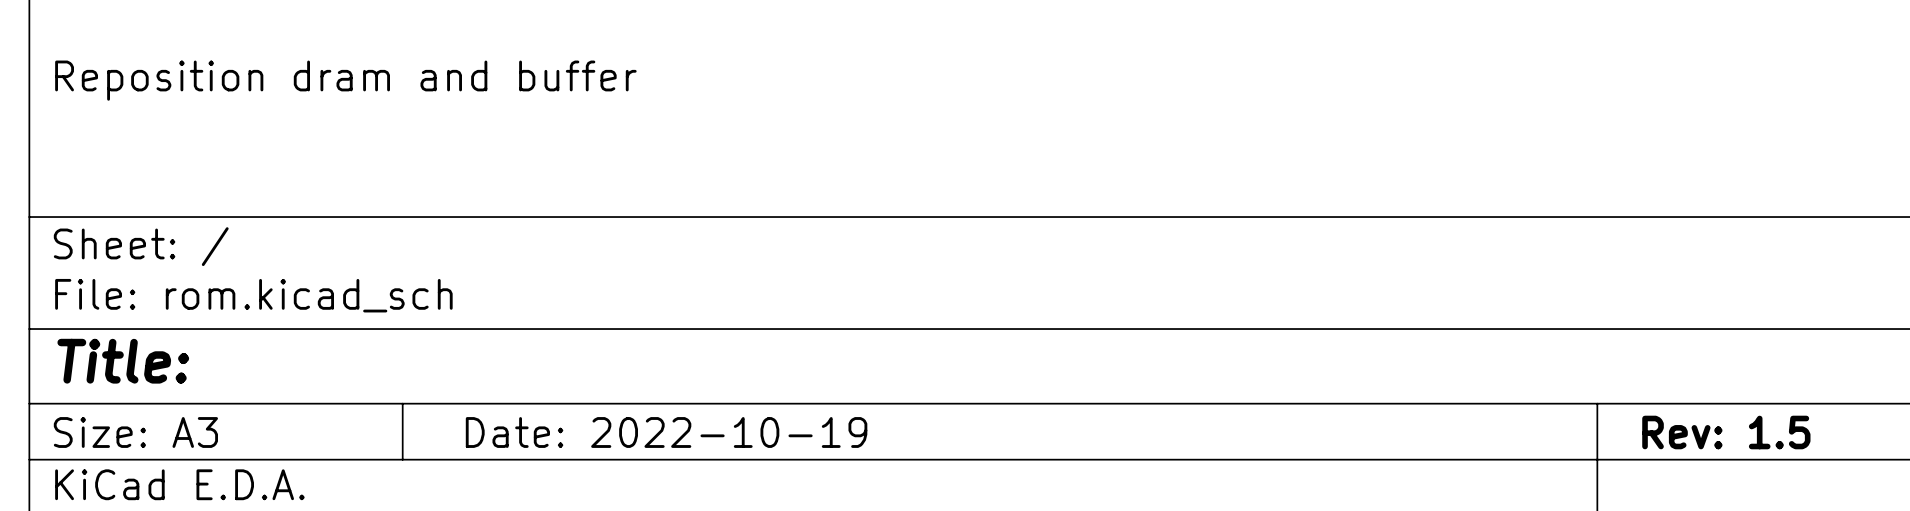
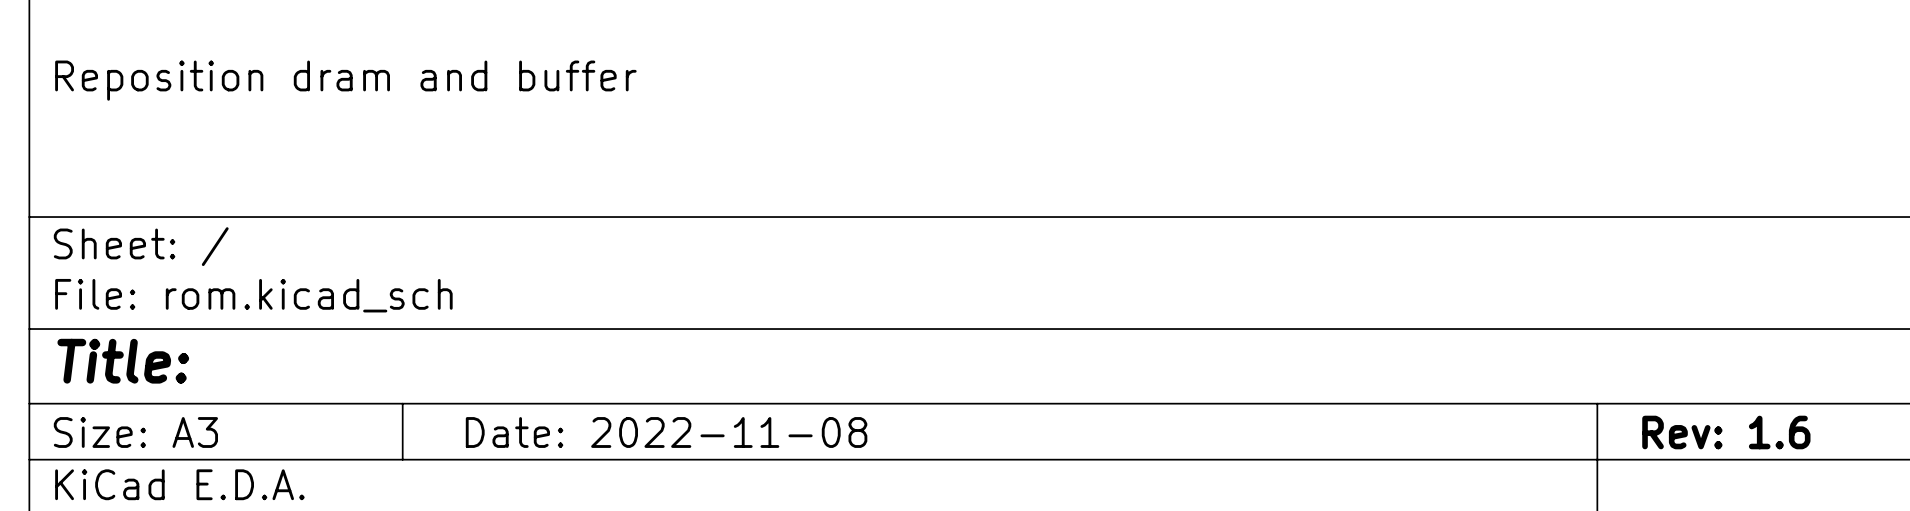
title block: Date: 2022-10-19 (666, 432) -> Date: 2022-11-08 (666, 432)
title block: Rev: 1.5 (1726, 432) -> Rev: 1.6 (1726, 432)

